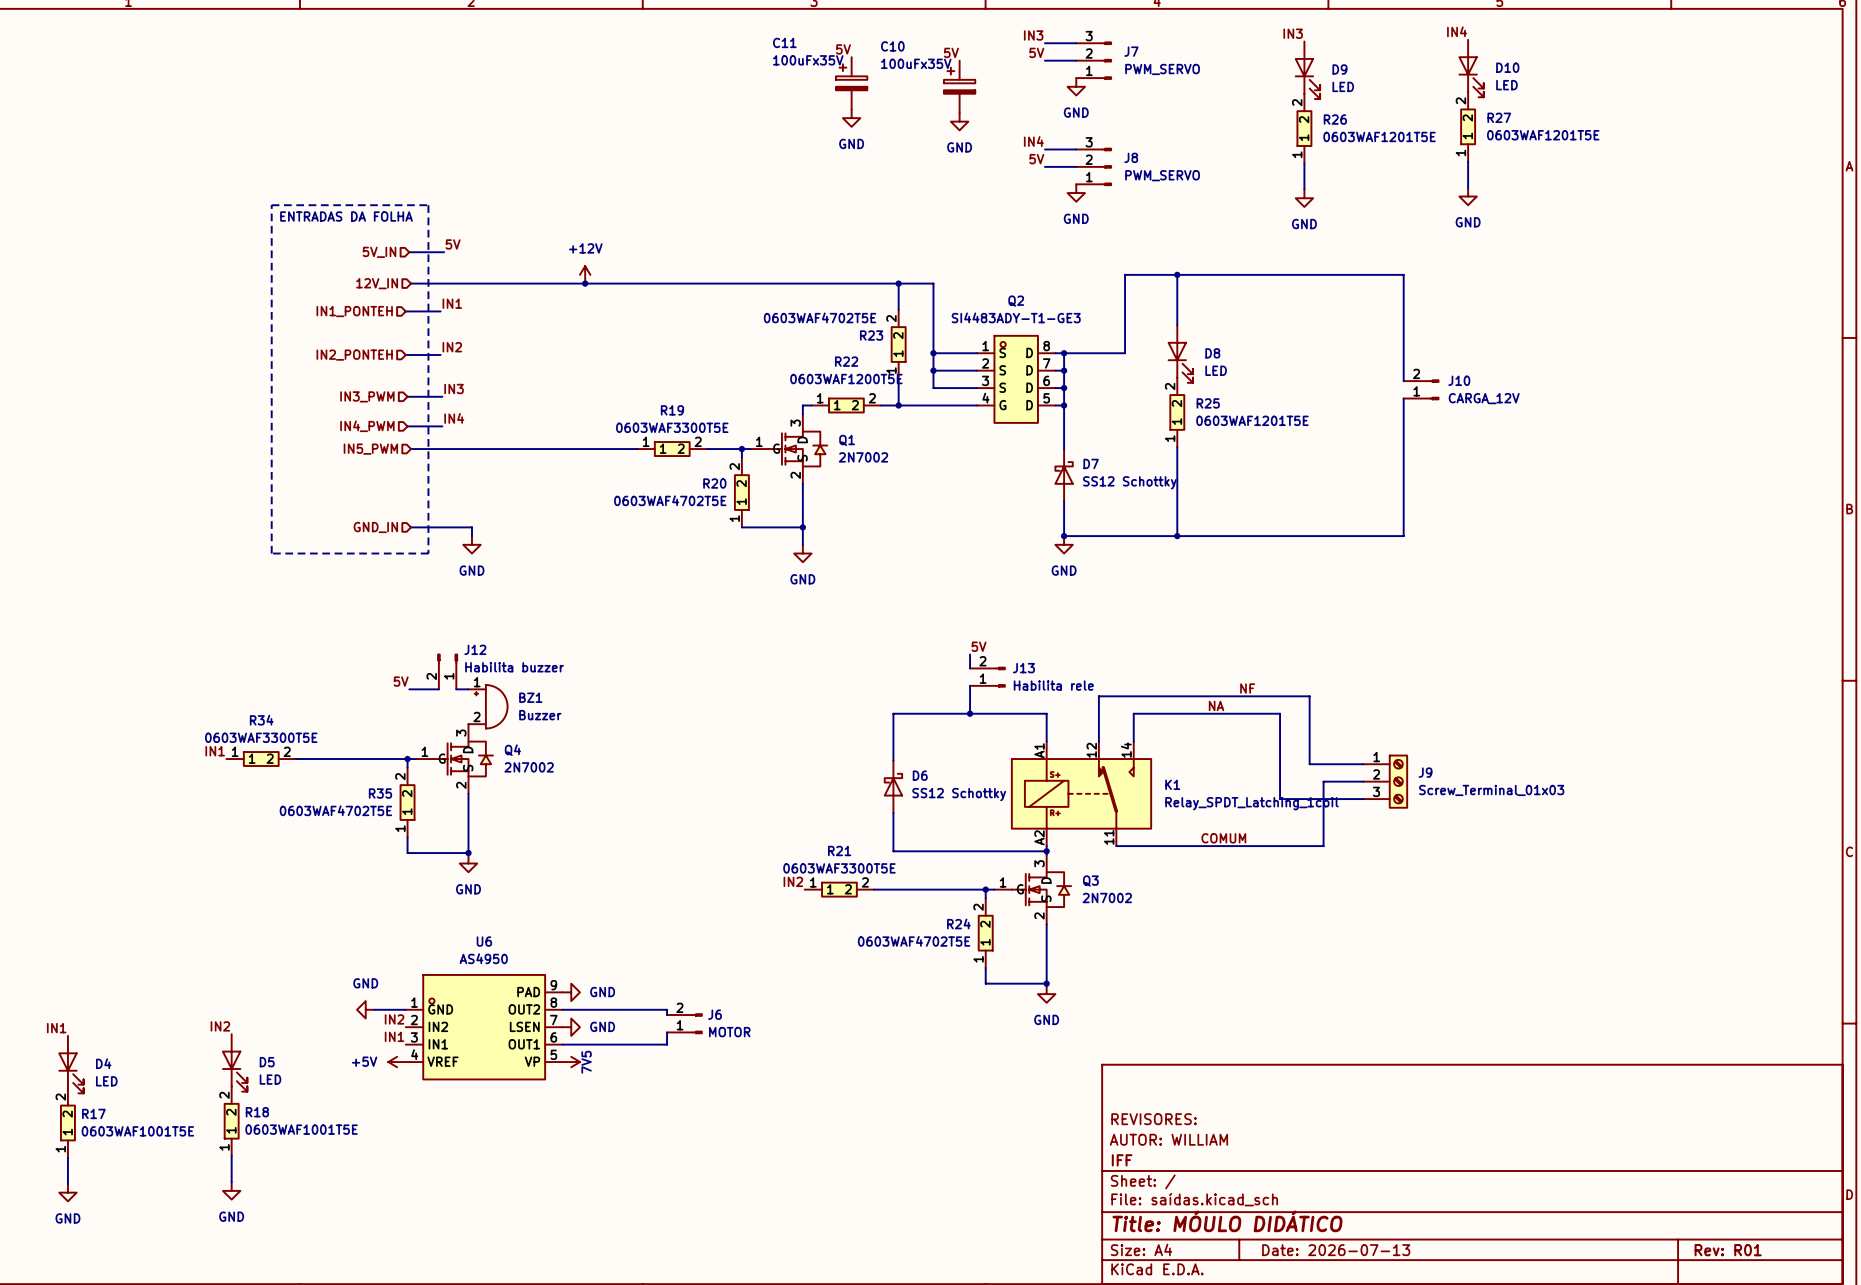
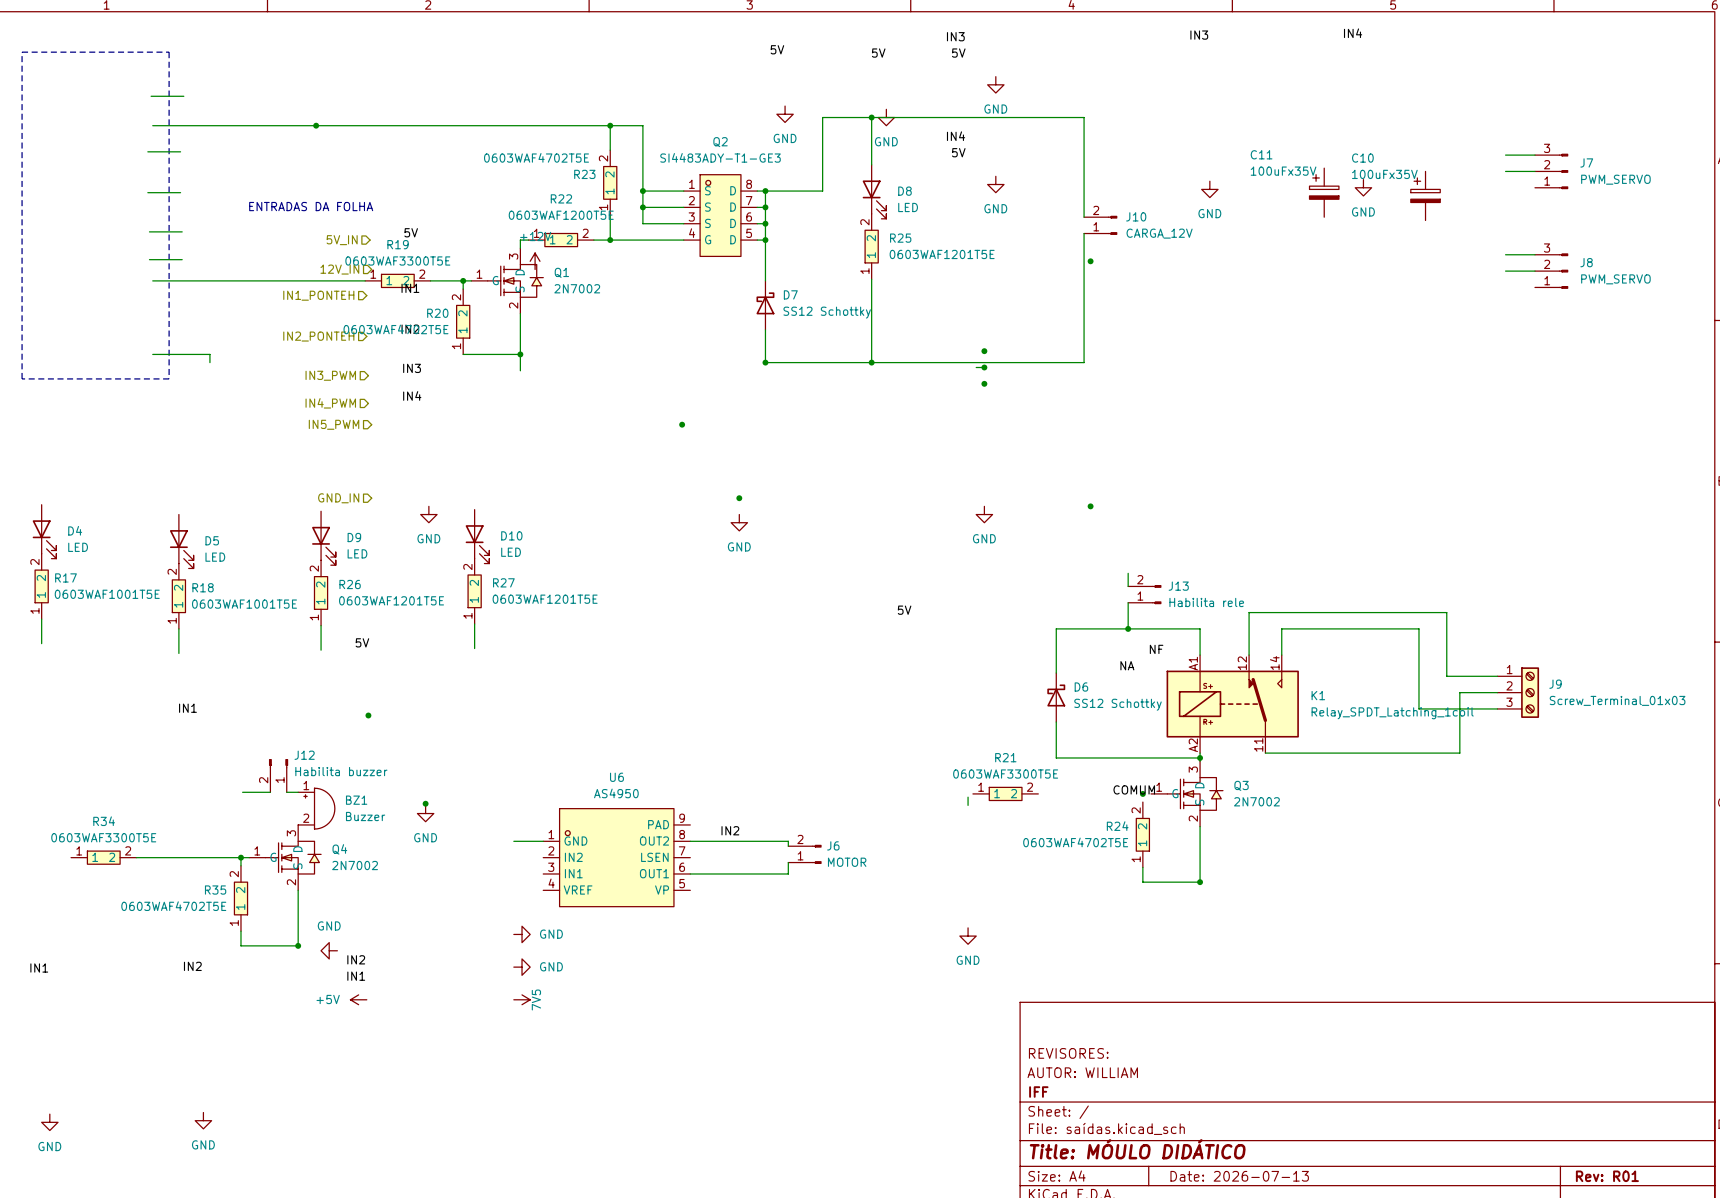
wire: (1044, 43) (1076, 43) -> none
line: none -> (22, 52) (169, 52) (169, 378) (22, 378) (22, 52)
wire: (1044, 60) (1076, 60) -> none
J7 position: (1093, 60) -> (1551, 171)
D10 position: (1471, 68) -> (477, 536)
D9 position: (1307, 70) -> (323, 538)
C11 position: (851, 83) -> (1324, 192)
C10 position: (959, 86) -> (1425, 195)
wire: none -> (151, 96) (183, 96)
wire: none -> (871, 117) (871, 164)
junction: none -> (871, 117)
R27 position: (1468, 126) -> (474, 591)
R26 position: (1304, 128) -> (321, 592)
wire: none -> (152, 125) (642, 125) (642, 223) (683, 223)
junction: none -> (316, 125)
wire: none -> (610, 125) (610, 150)
junction: none -> (610, 125)
wire: (1044, 149) (1076, 149) -> none
wire: none -> (147, 151) (180, 151)
wire: (1468, 161) (1468, 187) -> none
wire: none -> (1505, 155) (1534, 155)
wire: (1304, 163) (1304, 189) -> none
wire: (1044, 166) (1076, 166) -> none
J8 position: (1093, 166) -> (1551, 271)
wire: none -> (1505, 171) (1534, 171)
wire: none -> (642, 191) (683, 191)
junction: none -> (642, 191)
wire: none -> (757, 191) (822, 191) (822, 117) (1084, 117) (1084, 217)
wire: none -> (765, 191) (765, 280)
junction: none -> (765, 191)
wire: none -> (147, 192) (180, 192)
line: (271, 205) (428, 205) (428, 553) (271, 553) (271, 205) -> none
wire: none -> (642, 207) (683, 207)
junction: none -> (642, 207)
wire: none -> (757, 207) (765, 207)
junction: none -> (765, 207)
wire: none -> (610, 215) (610, 240)
wire: none -> (757, 223) (765, 223)
junction: none -> (765, 223)
wire: none -> (149, 231) (182, 231)
wire: none -> (1084, 233) (1084, 362) (765, 362) (765, 329)
wire: (409, 252) (444, 252) -> none
wire: none -> (528, 240) (520, 240) (520, 248)
wire: none -> (593, 240) (683, 240)
junction: none -> (610, 240)
wire: none -> (757, 240) (765, 240)
junction: none -> (765, 240)
wire: none -> (1505, 254) (1534, 254)
wire: none -> (149, 259) (182, 259)
wire: (1177, 274) (1177, 325) -> none
wire: (411, 283) (933, 283) (933, 388) (977, 388) -> none
junction: (585, 283) -> none
wire: (898, 283) (898, 309) -> none
junction: (898, 283) -> none
wire: none -> (1505, 271) (1534, 271)
wire: none -> (871, 279) (871, 362)
wire: none -> (152, 280) (365, 280)
wire: none -> (430, 280) (471, 280)
wire: none -> (463, 280) (463, 289)
junction: none -> (463, 280)
wire: (405, 311) (440, 311) -> none
wire: none -> (520, 313) (520, 370)
R23 position: (898, 344) -> (610, 182)
wire: (933, 353) (977, 353) -> none
junction: (933, 353) -> none
wire: (1055, 353) (1125, 353) (1125, 274) (1403, 274) (1403, 381) -> none
wire: (1064, 353) (1064, 449) -> none
junction: (1064, 353) -> none
wire: (405, 354) (440, 354) -> none
D8 position: (1180, 354) -> (874, 191)
wire: (933, 370) (977, 370) -> none
junction: (933, 370) -> none
wire: (1055, 370) (1064, 370) -> none
wire: none -> (152, 354) (209, 354) (209, 362)
wire: none -> (463, 354) (520, 354)
junction: none -> (520, 354)
wire: (898, 379) (898, 405) -> none
Q2 position: (1016, 379) -> (720, 215)
junction: none -> (765, 362)
junction: none -> (871, 362)
J10 position: (1421, 389) -> (1100, 225)
wire: (407, 396) (442, 396) -> none
wire: (1403, 398) (1403, 536) (1064, 536) (1064, 501) -> none
wire: (811, 405) (802, 405) (802, 414) -> none
R22 position: (846, 405) -> (561, 240)
wire: (881, 405) (977, 405) -> none
junction: (898, 405) -> none
wire: (1055, 405) (1064, 405) -> none
R25 position: (1177, 412) -> (871, 246)
wire: (407, 426) (442, 426) -> none
wire: (1177, 447) (1177, 536) -> none
wire: (411, 449) (637, 449) -> none
R19 position: (672, 449) -> (397, 280)
wire: (707, 449) (750, 449) -> none
wire: (741, 449) (741, 457) -> none
Q1 position: (788, 449) -> (507, 280)
D7 position: (1064, 475) -> (765, 305)
wire: (802, 483) (802, 544) -> none
R20 position: (741, 492) -> (463, 321)
wire: (411, 527) (471, 527) (471, 536) -> none
wire: (741, 527) (802, 527) -> none
junction: (1064, 536) -> none
wire: none -> (1128, 573) (1128, 586)
wire: none -> (1128, 602) (1128, 628)
wire: (970, 654) (970, 668) -> none
wire: none -> (41, 619) (41, 643)
wire: none -> (474, 624) (474, 648)
wire: none -> (321, 625) (321, 650)
wire: none -> (178, 628) (178, 653)
junction: none -> (1128, 628)
J12 position: (447, 671) -> (278, 775)
J13 position: (987, 677) -> (1144, 594)
wire: (970, 685) (970, 713) -> none
wire: (409, 689) (438, 689) -> none
wire: (456, 689) (468, 689) -> none
wire: none -> (1200, 655) (1200, 628) (1056, 628) (1056, 673)
wire: none -> (1249, 655) (1249, 612) (1446, 612) (1446, 676) (1497, 676)
wire: none -> (1281, 655) (1281, 628) (1418, 628) (1418, 708) (1497, 708)
BZ1 position: (488, 706) -> (316, 808)
junction: (970, 713) -> none
wire: (1046, 741) (1046, 713) (893, 713) (893, 760) -> none
wire: (1098, 741) (1098, 696) (1309, 696) (1309, 764) (1363, 764) -> none
wire: (1133, 741) (1133, 713) (1280, 713) (1280, 799) (1363, 799) -> (1497, 692) (1459, 692) (1459, 753) (1265, 753)
R34 position: (261, 759) -> (103, 857)
wire: (296, 759) (416, 759) -> none
wire: (407, 759) (407, 767) -> none
Q4 position: (454, 759) -> (285, 857)
wire: none -> (1056, 722) (1056, 757) (1200, 757)
wire: (1363, 781) (1323, 781) (1323, 846) (1116, 846) -> none
J9 position: (1385, 781) -> (1518, 692)
D6 position: (893, 786) -> (1056, 697)
wire: (468, 793) (468, 854) -> none
K1 position: (1081, 793) -> (1232, 704)
R35 position: (407, 802) -> (240, 898)
junction: none -> (1200, 757)
wire: (893, 813) (893, 851) (1046, 851) -> none
wire: (407, 837) (407, 853) (468, 853) -> none
wire: none -> (242, 792) (270, 792)
wire: none -> (286, 792) (298, 792)
junction: none -> (1142, 793)
junction: (1046, 851) -> none
wire: none -> (1200, 826) (1200, 883)
R21 position: (839, 889) -> (1005, 793)
wire: (874, 889) (994, 889) -> none
wire: (985, 889) (985, 898) -> none
junction: (985, 889) -> none
Q3 position: (1032, 889) -> (1186, 793)
wire: none -> (513, 841) (543, 841)
wire: none -> (690, 841) (788, 841) (788, 846)
wire: none -> (136, 857) (249, 857)
wire: none -> (240, 857) (240, 865)
junction: none -> (240, 857)
wire: none -> (788, 862) (788, 873) (690, 873)
wire: none -> (1142, 867) (1142, 882) (1200, 882)
wire: (1046, 924) (1046, 985) -> none
R24 position: (985, 933) -> (1142, 834)
junction: none -> (1200, 882)
wire: none -> (298, 890) (298, 947)
wire: (985, 967) (985, 983) (1046, 983) -> none
junction: (1046, 983) -> none
wire: none -> (240, 931) (240, 945) (298, 945)
junction: none -> (298, 945)
wire: (374, 1009) (405, 1009) -> none
wire: (562, 1009) (667, 1009) (667, 1015) -> none
J6 position: (684, 1023) -> (804, 854)
U6 position: (484, 1027) -> (616, 857)
wire: (667, 1032) (667, 1044) (562, 1044) -> none
D5 position: (234, 1062) -> (181, 541)
D4 position: (71, 1064) -> (44, 531)
R18 position: (231, 1121) -> (178, 596)
R17 position: (67, 1122) -> (41, 586)
wire: (231, 1156) (231, 1182) -> none
wire: (67, 1157) (67, 1183) -> none

